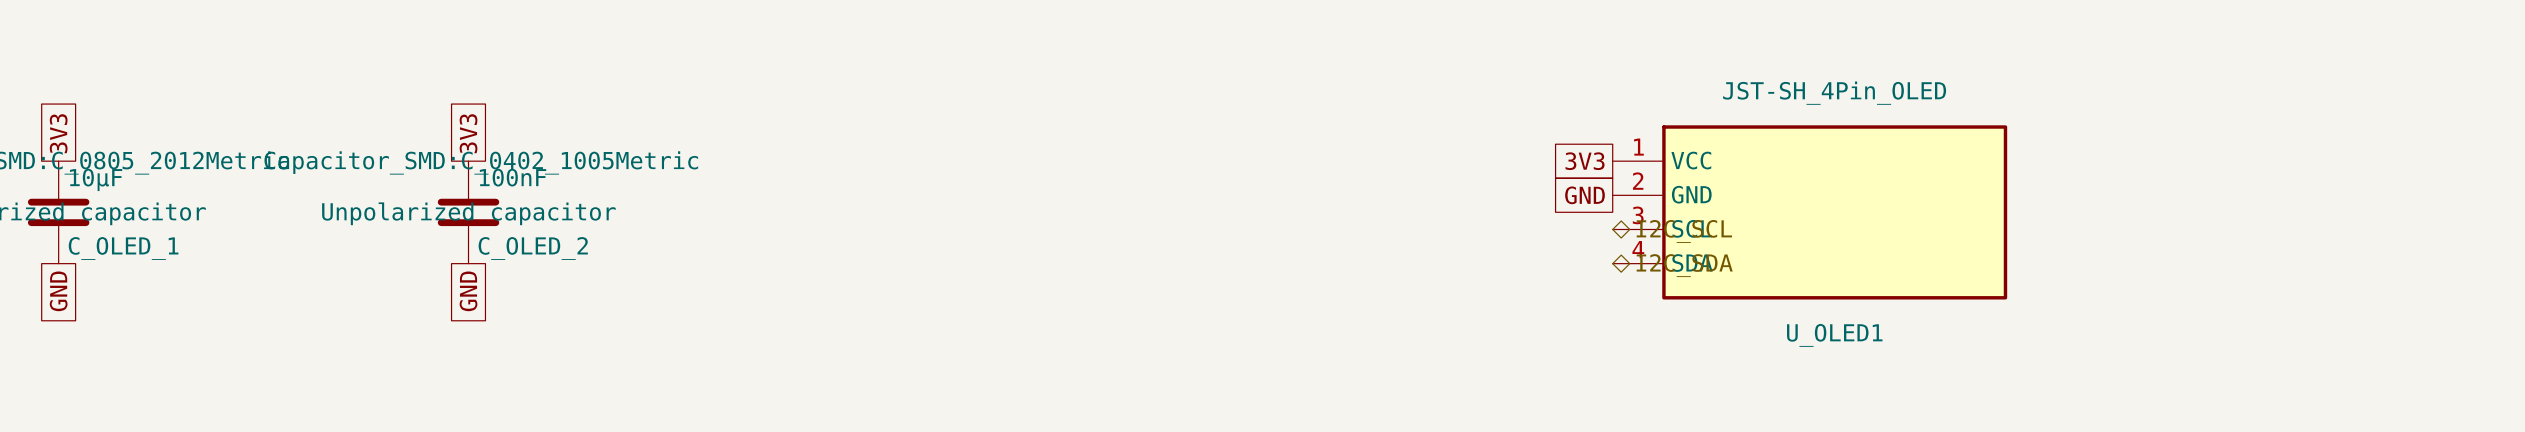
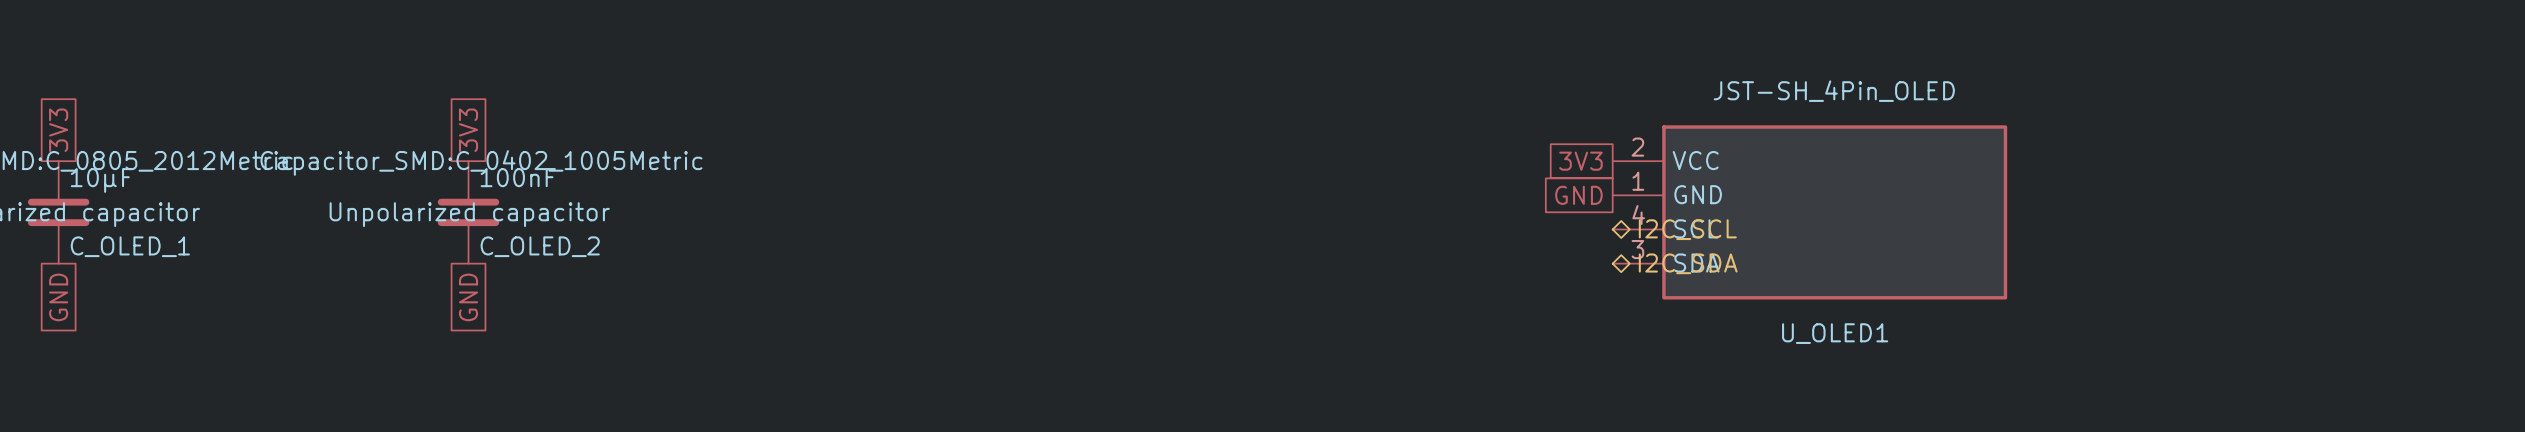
U_OLED1 pin number: 1 (1638, 147) -> 2 (1637, 147)
U_OLED1 pin number: 2 (1638, 181) -> 1 (1638, 181)
U_OLED1 pin number: 3 (1638, 215) -> 4 (1638, 214)
U_OLED1 pin number: 4 (1638, 249) -> 3 (1637, 249)

